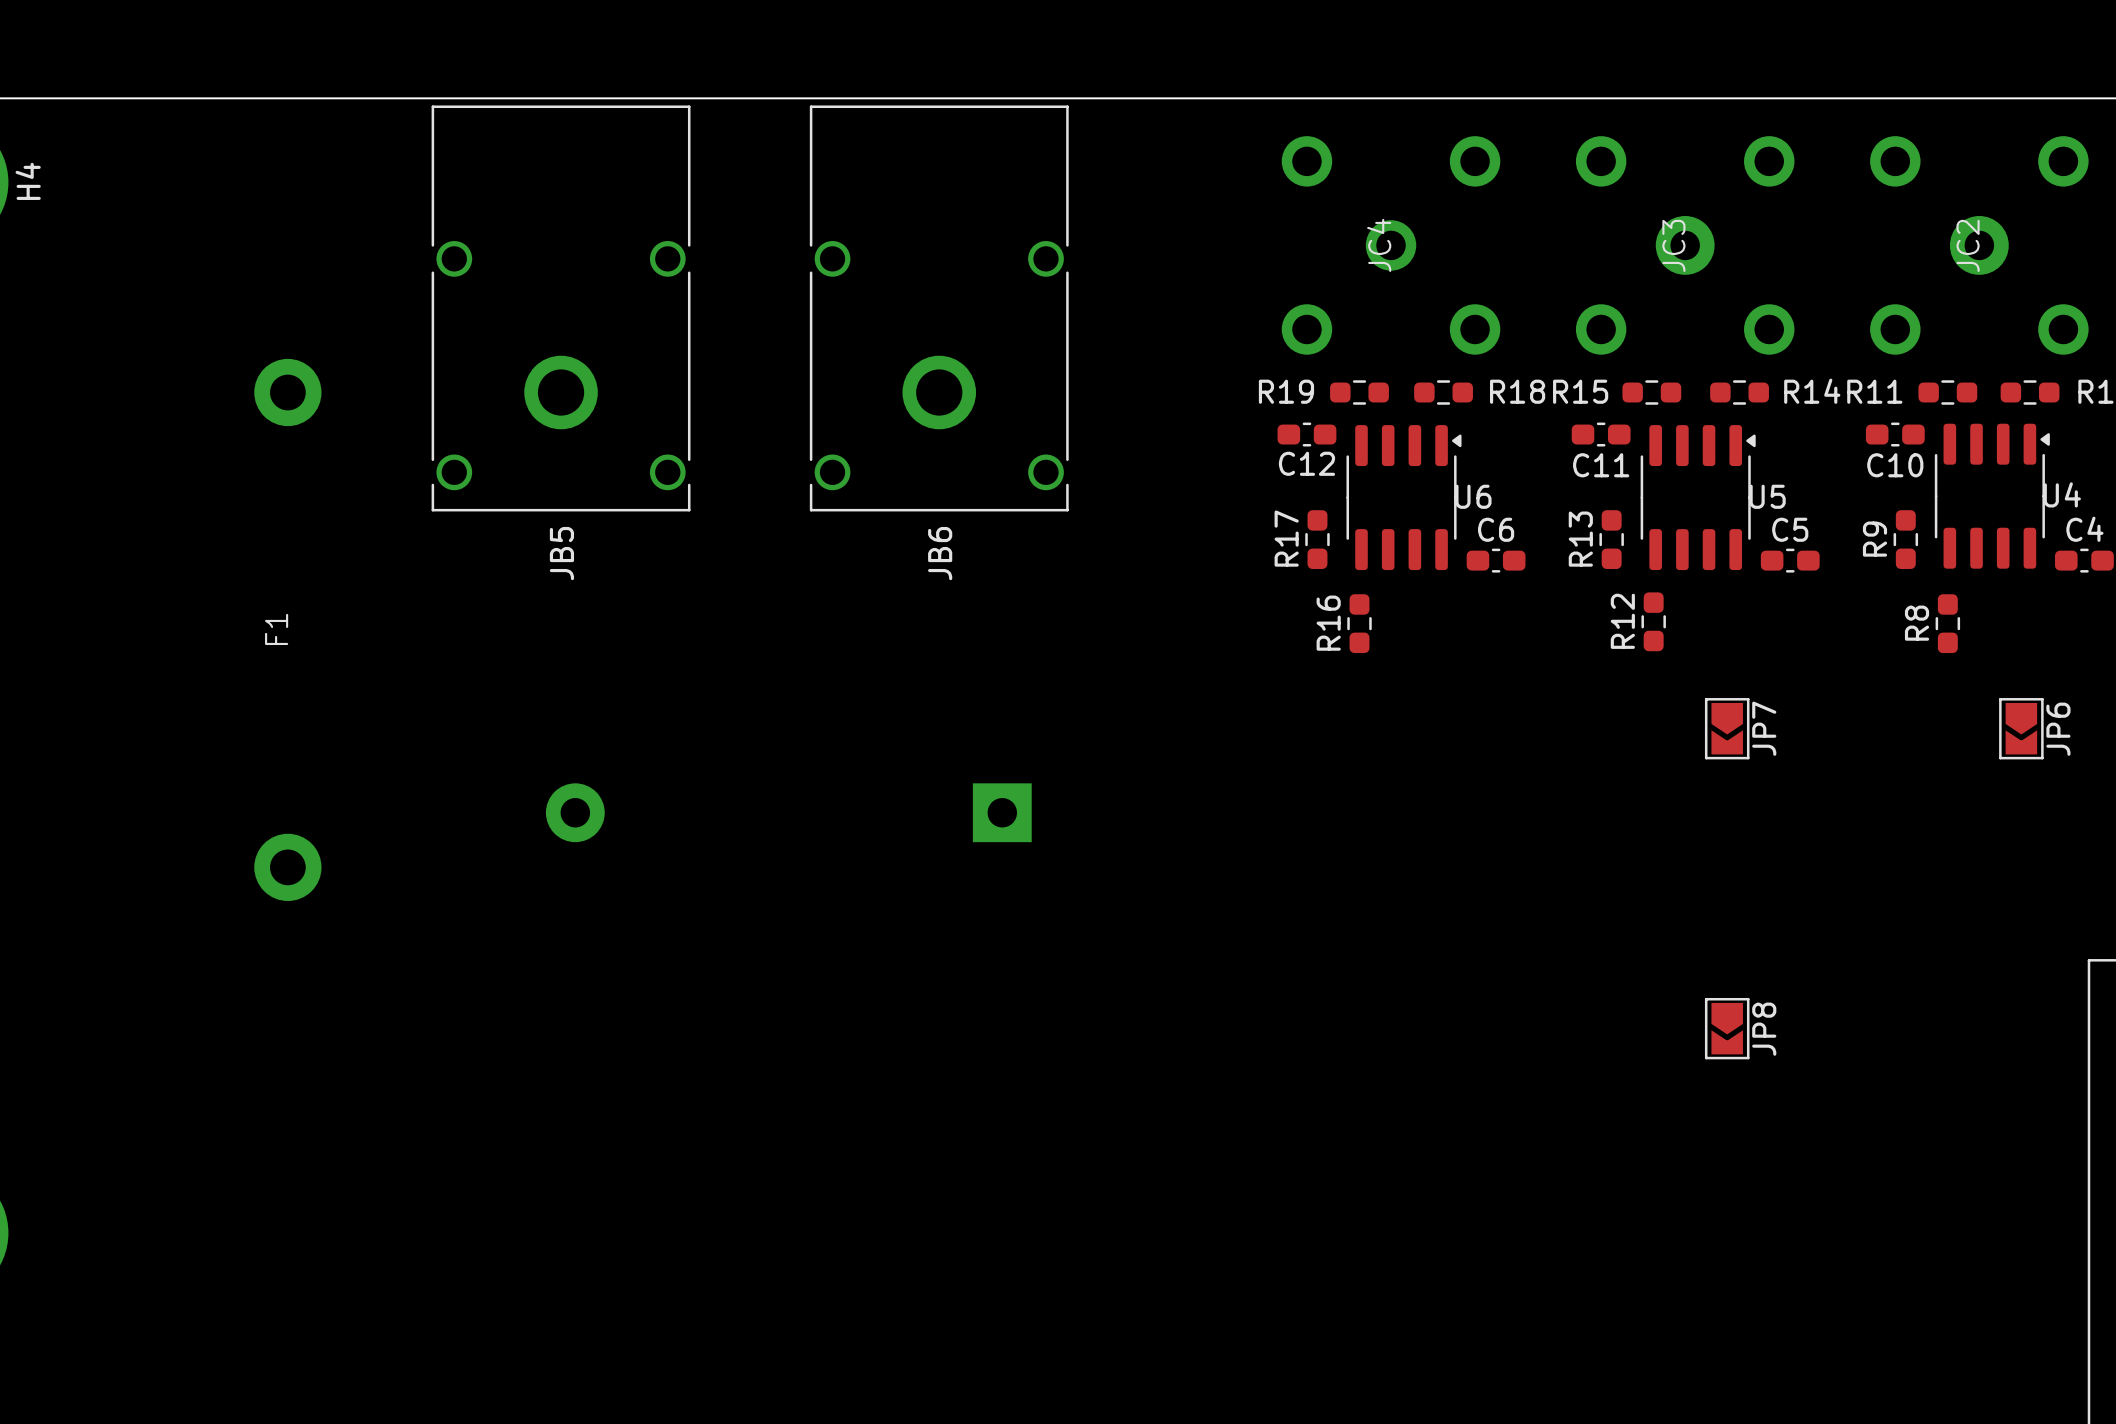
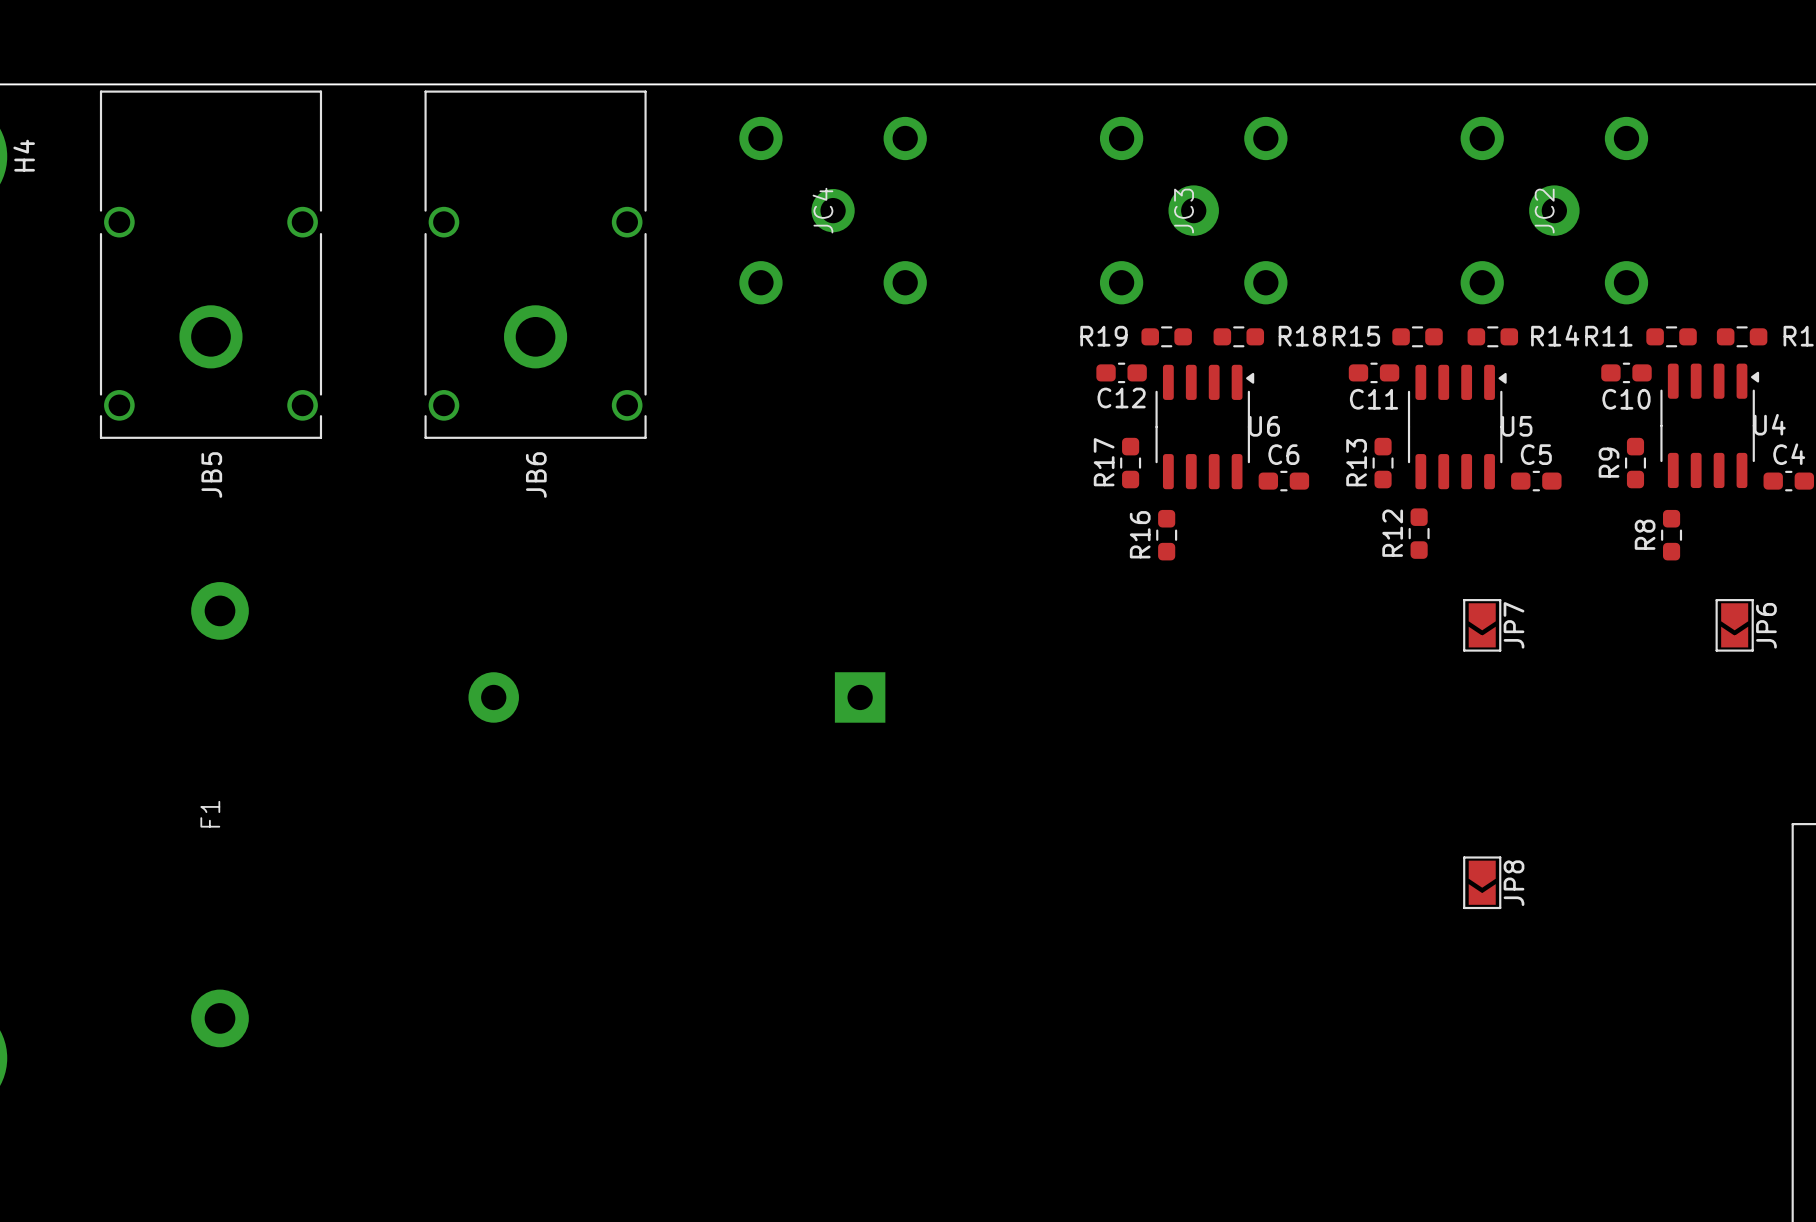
JC4 position: (1391, 245) -> (833, 210)
JC3 position: (1685, 245) -> (1193, 210)
JC2 position: (1979, 245) -> (1554, 210)
JB5 position: (561, 308) -> (210, 264)
JB6 position: (939, 308) -> (535, 264)
F1 position: (287, 629) -> (220, 814)

